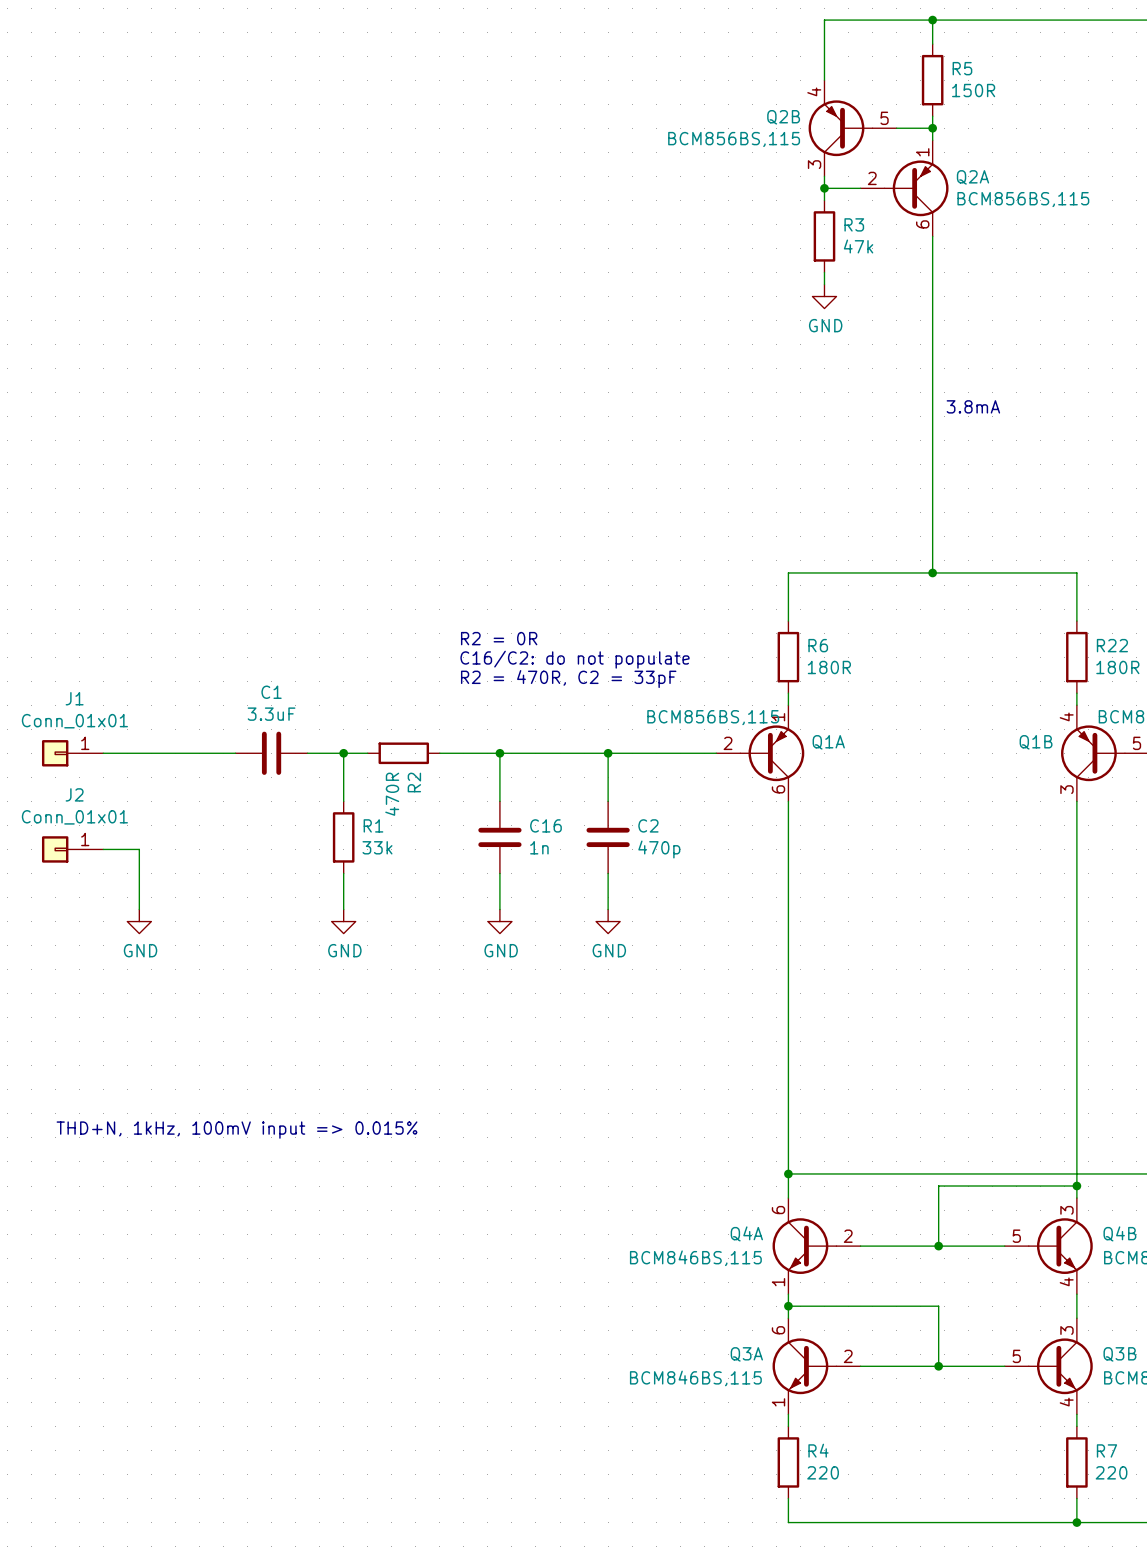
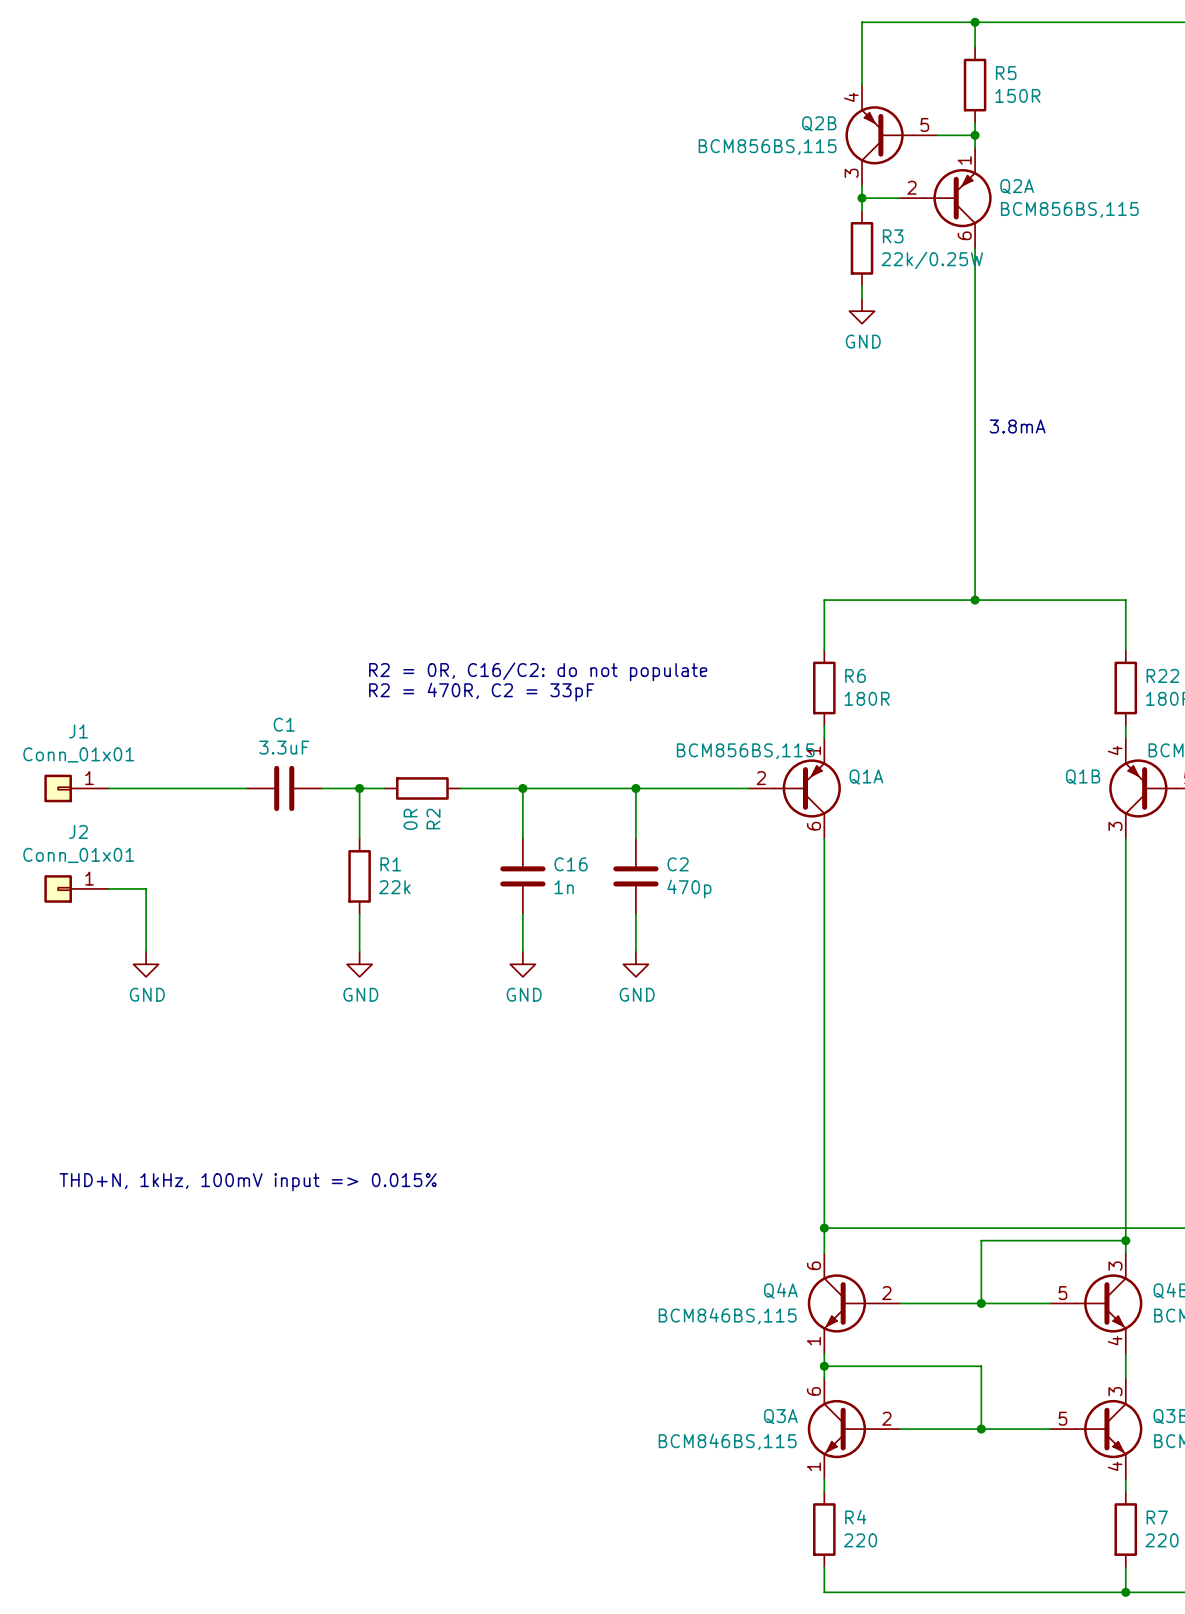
R3 value: 47k (858, 246) -> 22k/0.25W (932, 260)
text: R2 = 0R (499, 638) -> none
text: C16/C2: do not populate (575, 659) -> R2 = 0R, C16/C2: do not populate (538, 671)
text position: R2 = 470R, C2 = 33pF (568, 679) -> R2 = 470R, C2 = 33pF (481, 692)
R2 value: 470R (392, 794) -> 0R (410, 819)
R1 value: 33k (377, 847) -> 22k (394, 887)

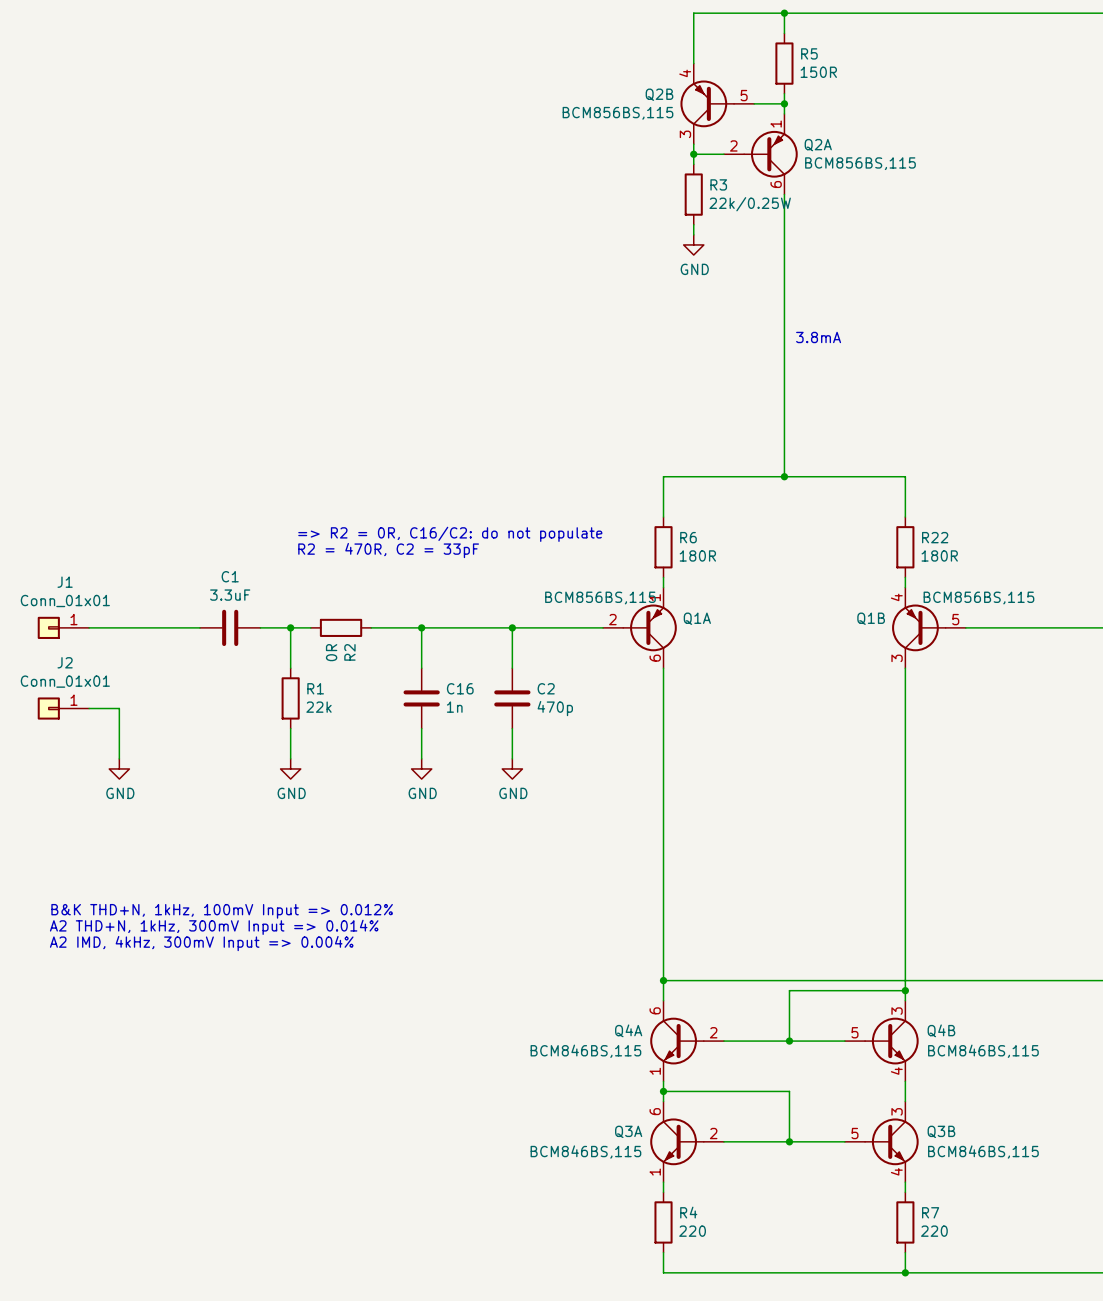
text: R2 = 0R, C16/C2: do not populate (538, 671) -> => R2 = 0R, C16/C2: do not populate (450, 534)
text: none -> B&K THD+N, 1kHz, 100mV Input => 0.012% (222, 911)
text: none -> A2 THD+N, 1kHz, 300mV Input => 0.014% (214, 927)
text: THD+N, 1kHz, 100mV input => 0.015% (248, 1182) -> A2 IMD, 4kHz, 300mV Input => 0.004% (201, 943)

